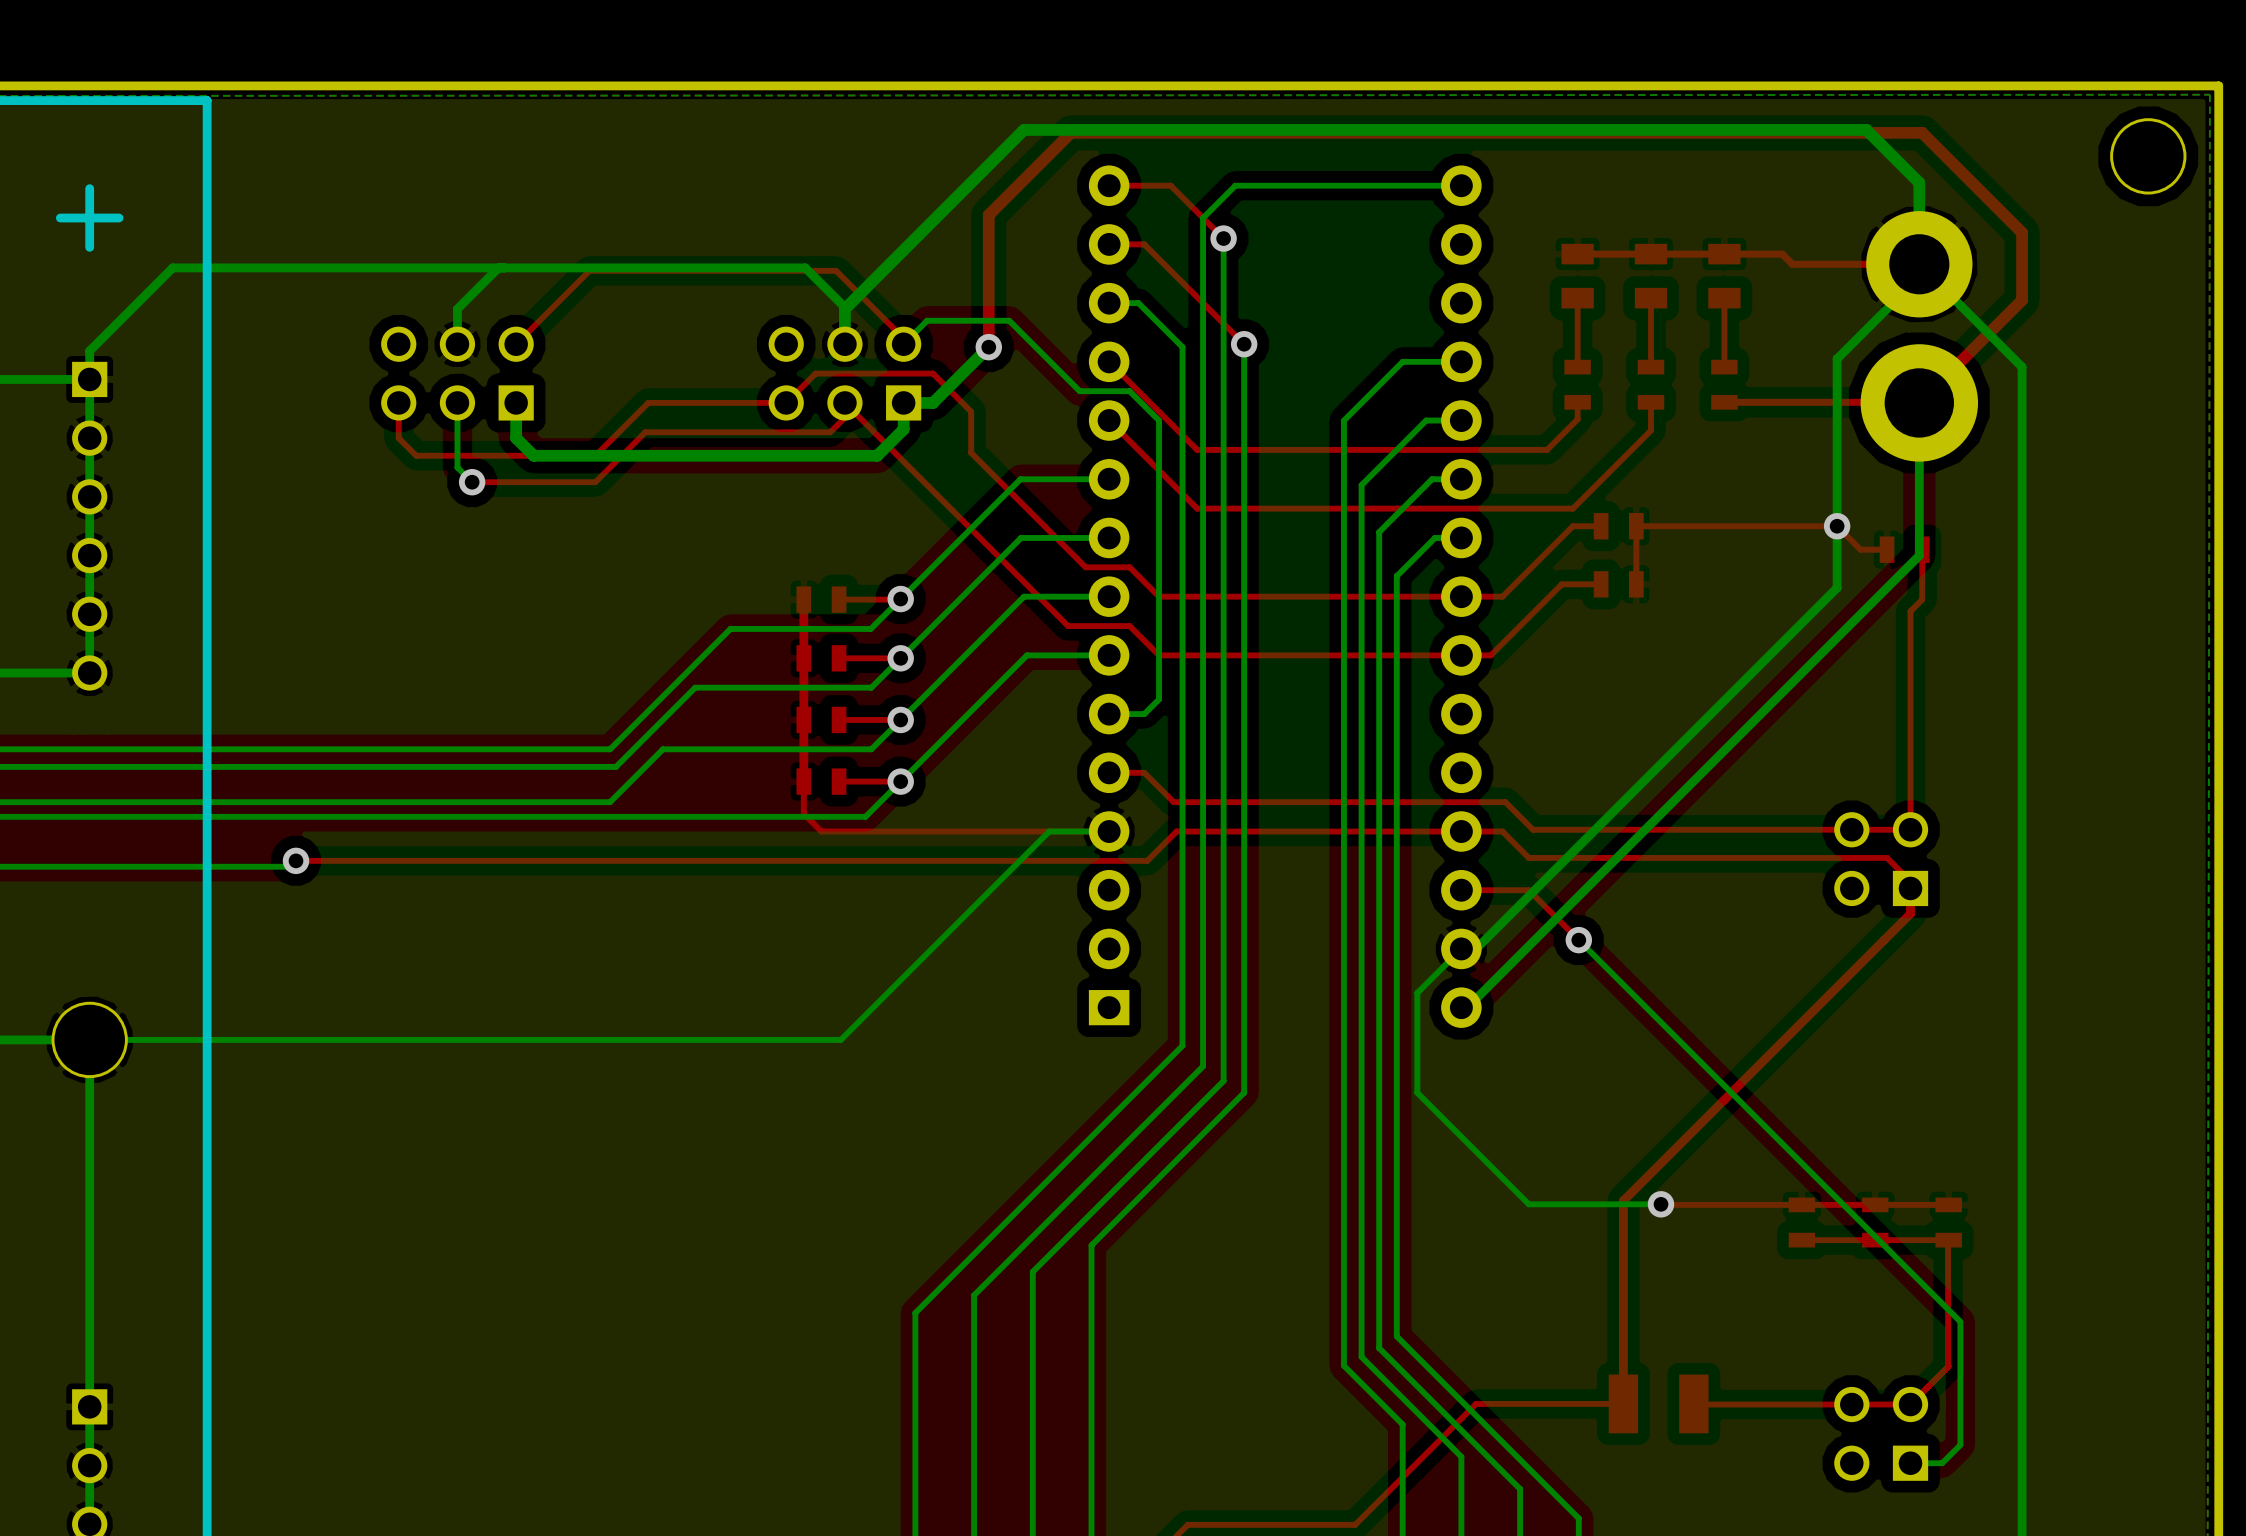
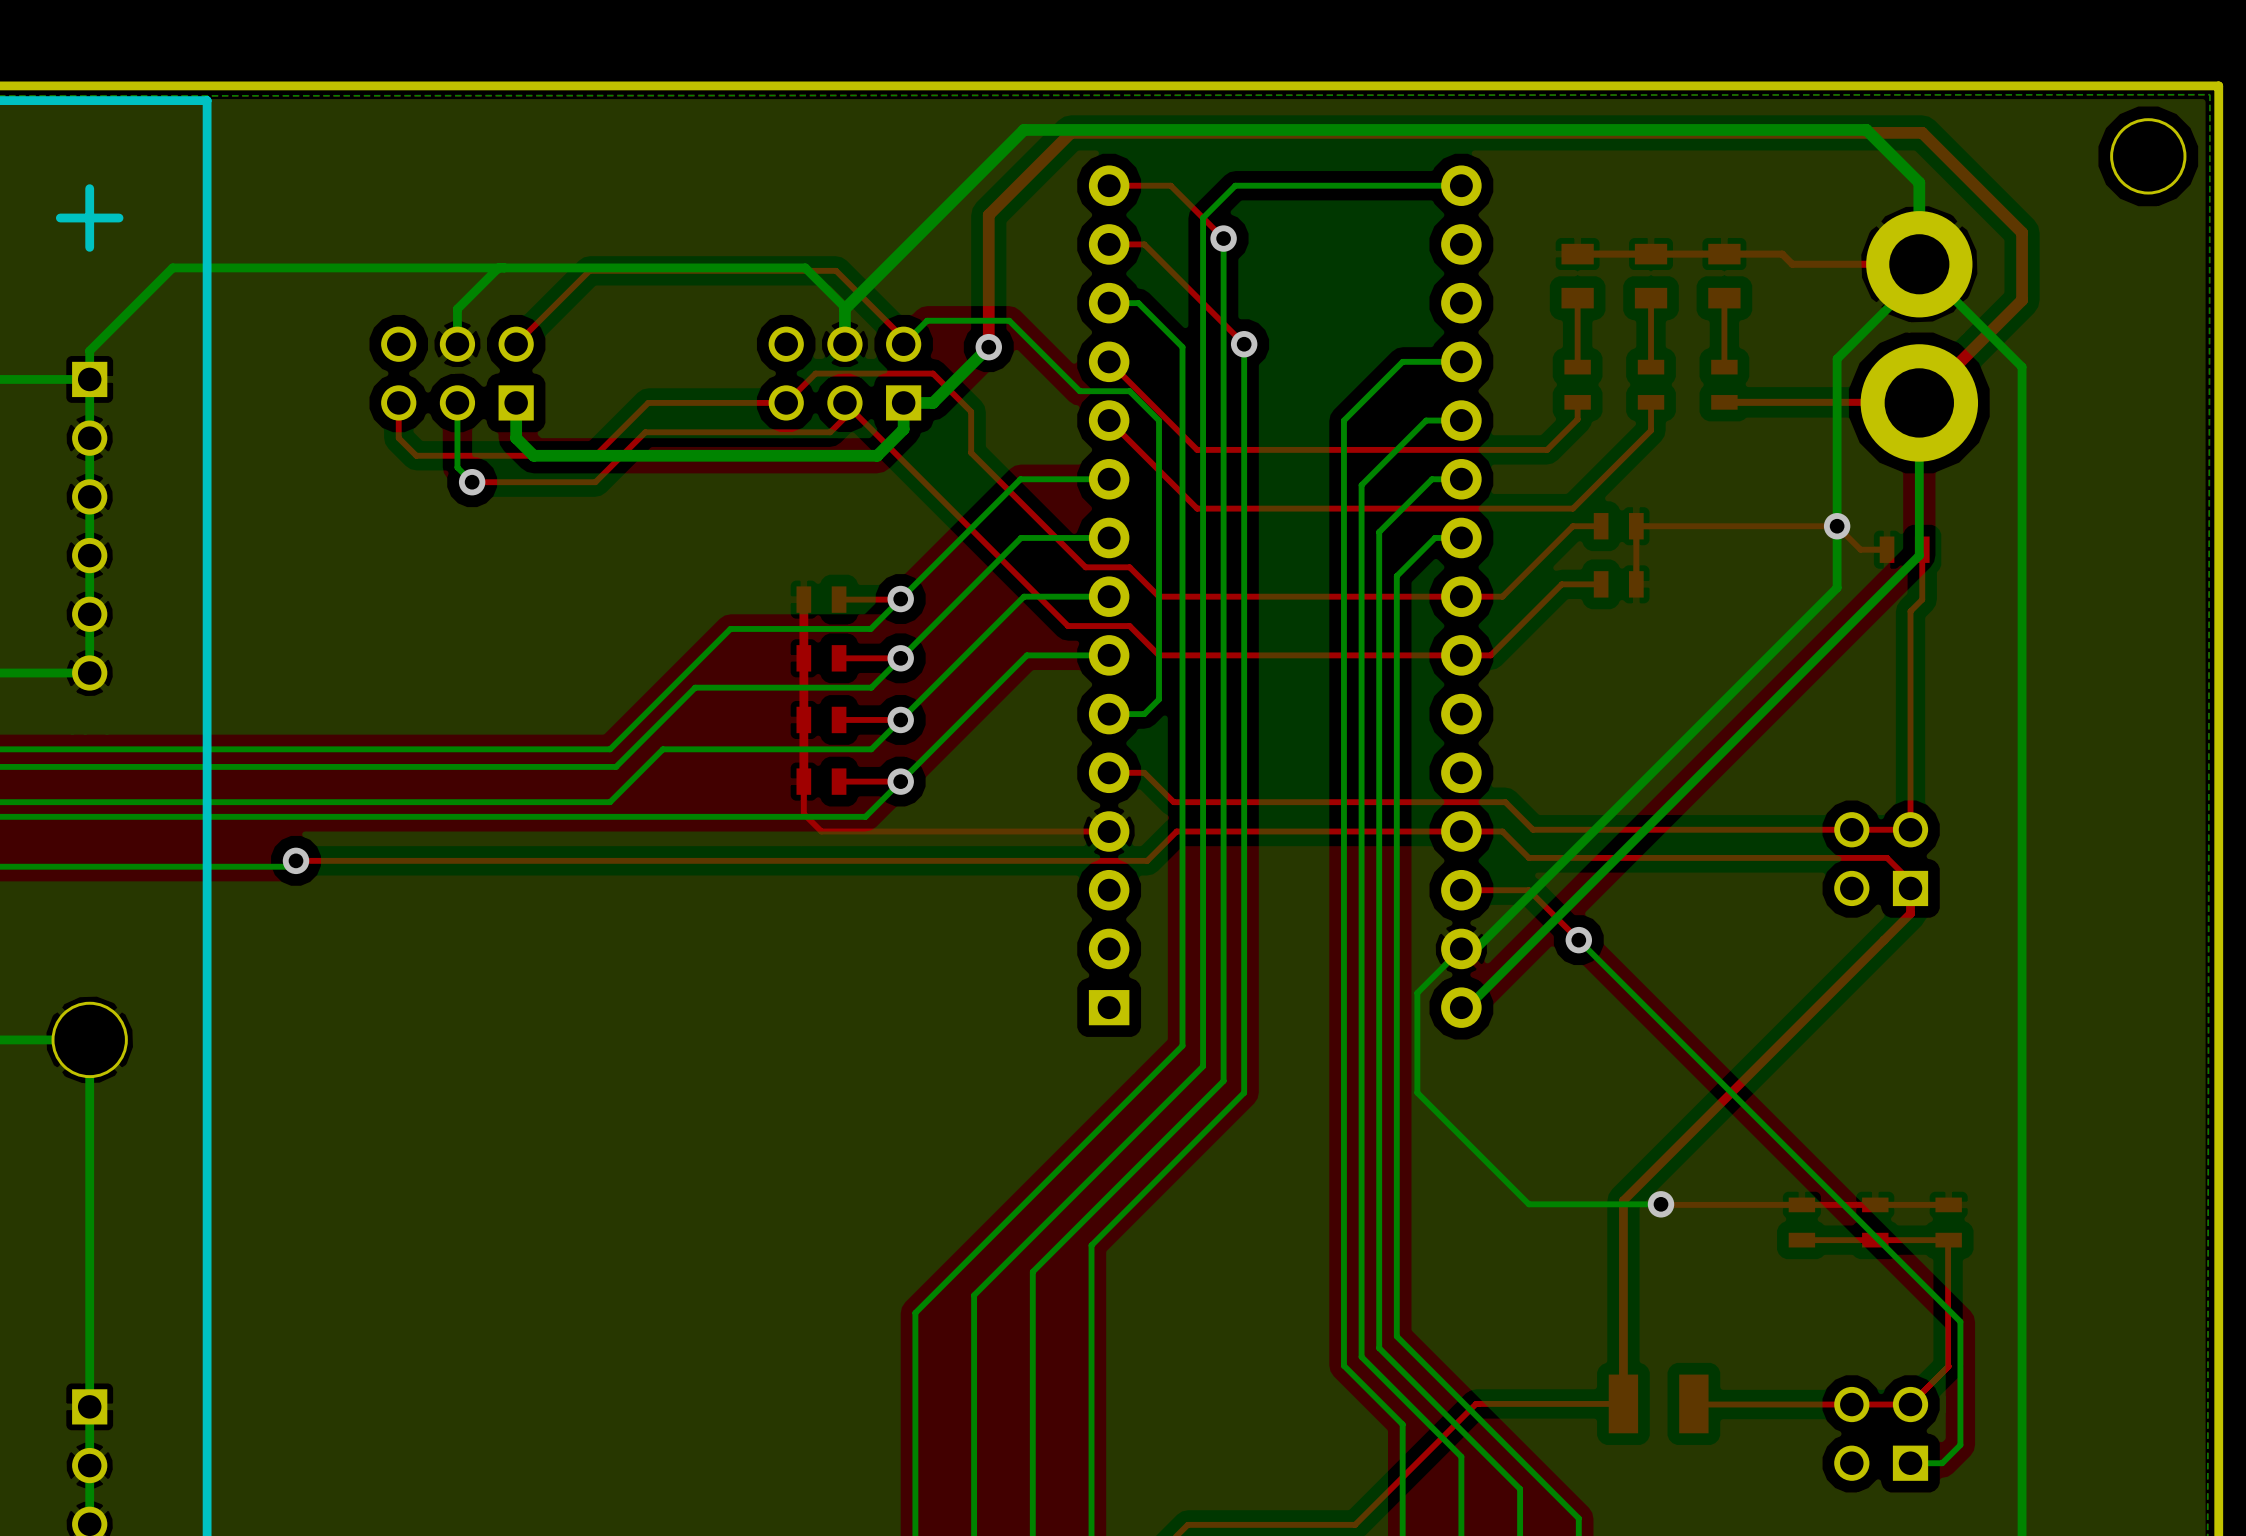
bottom track: (1109, 831) (1049, 831) (840, 1039) (89, 1039) -> none

